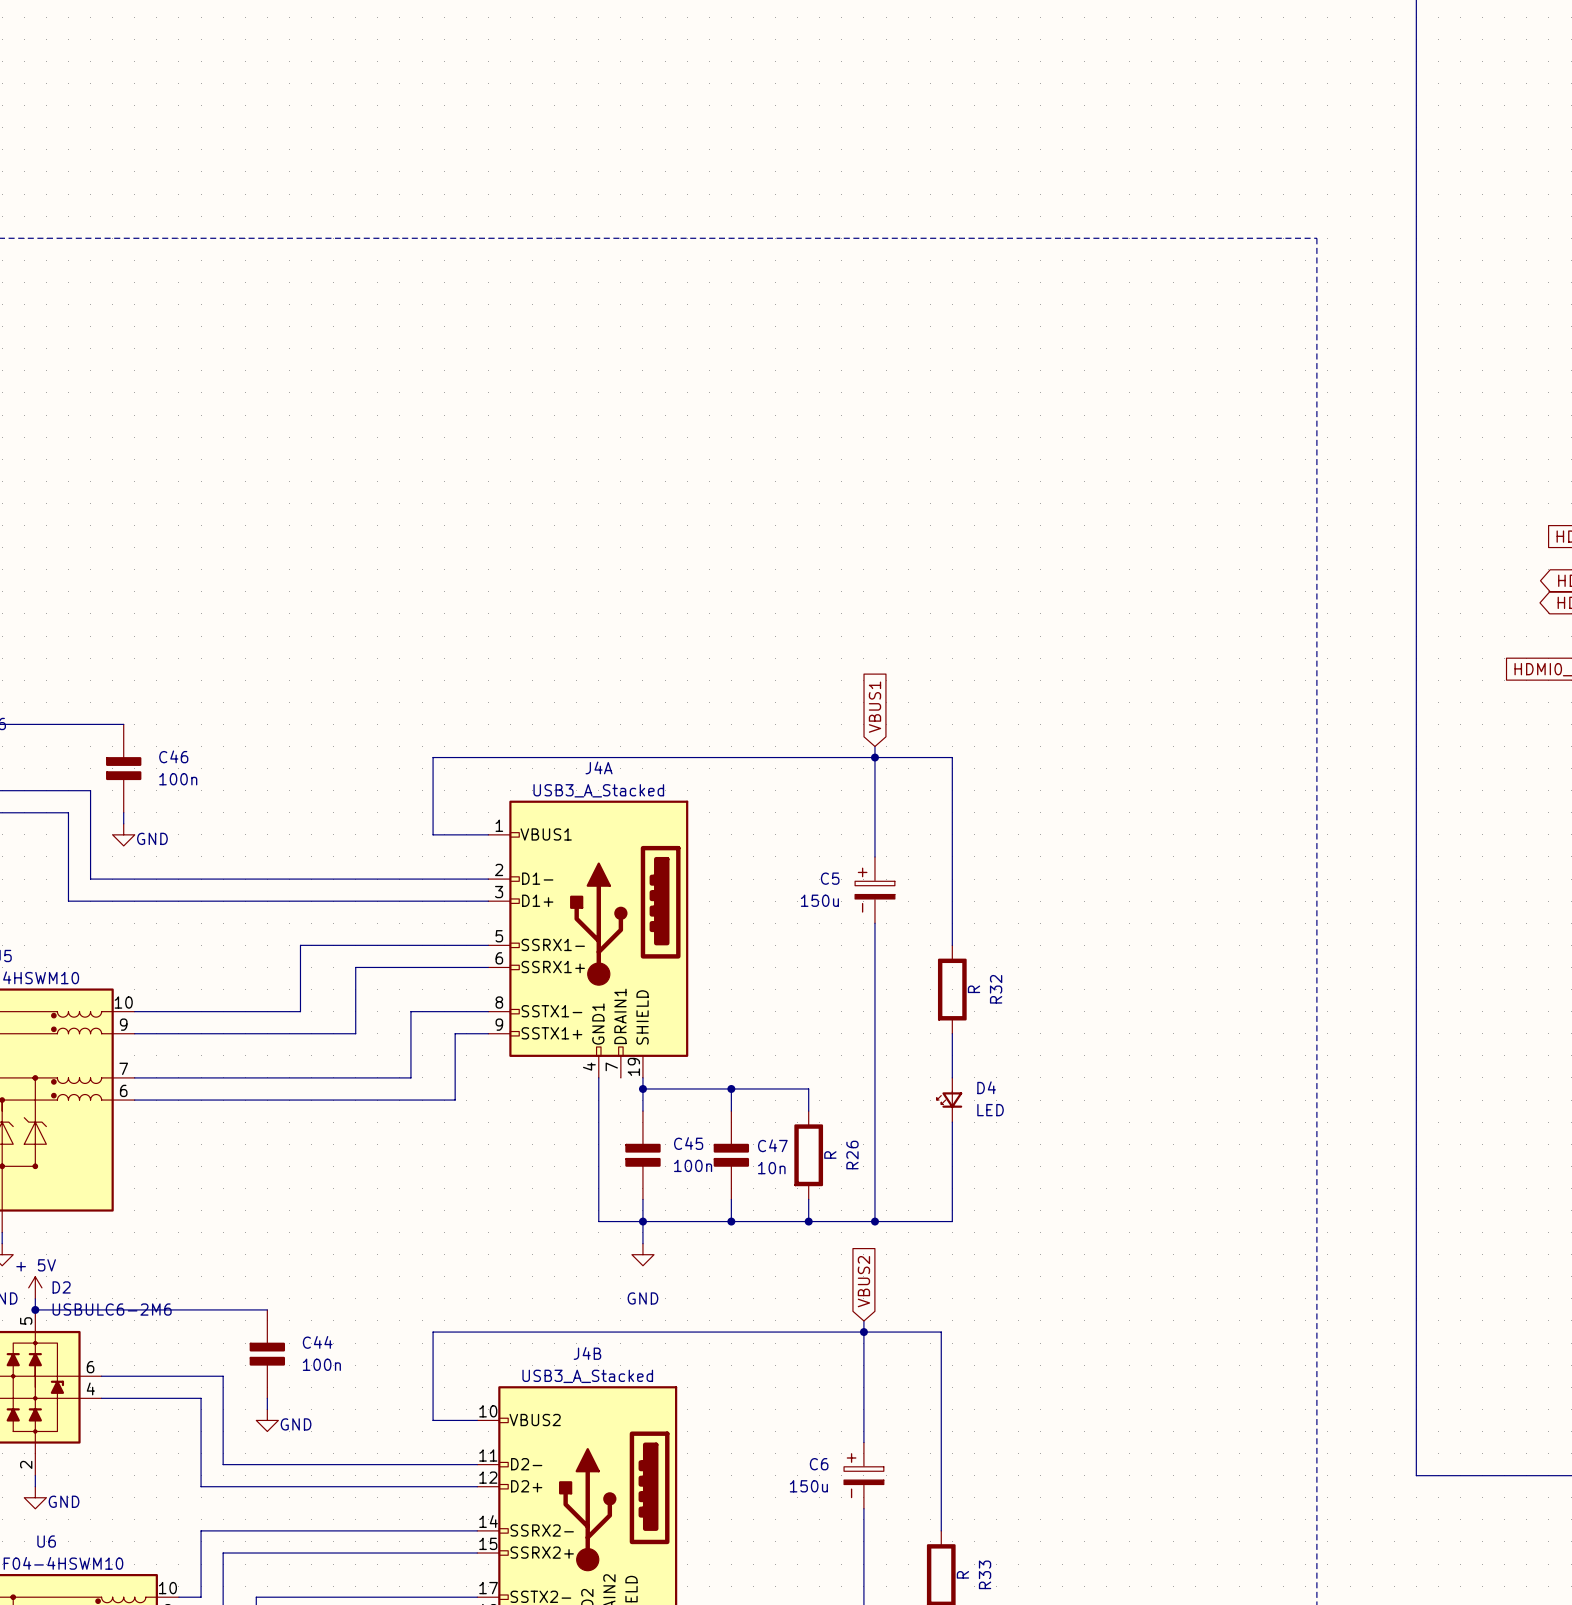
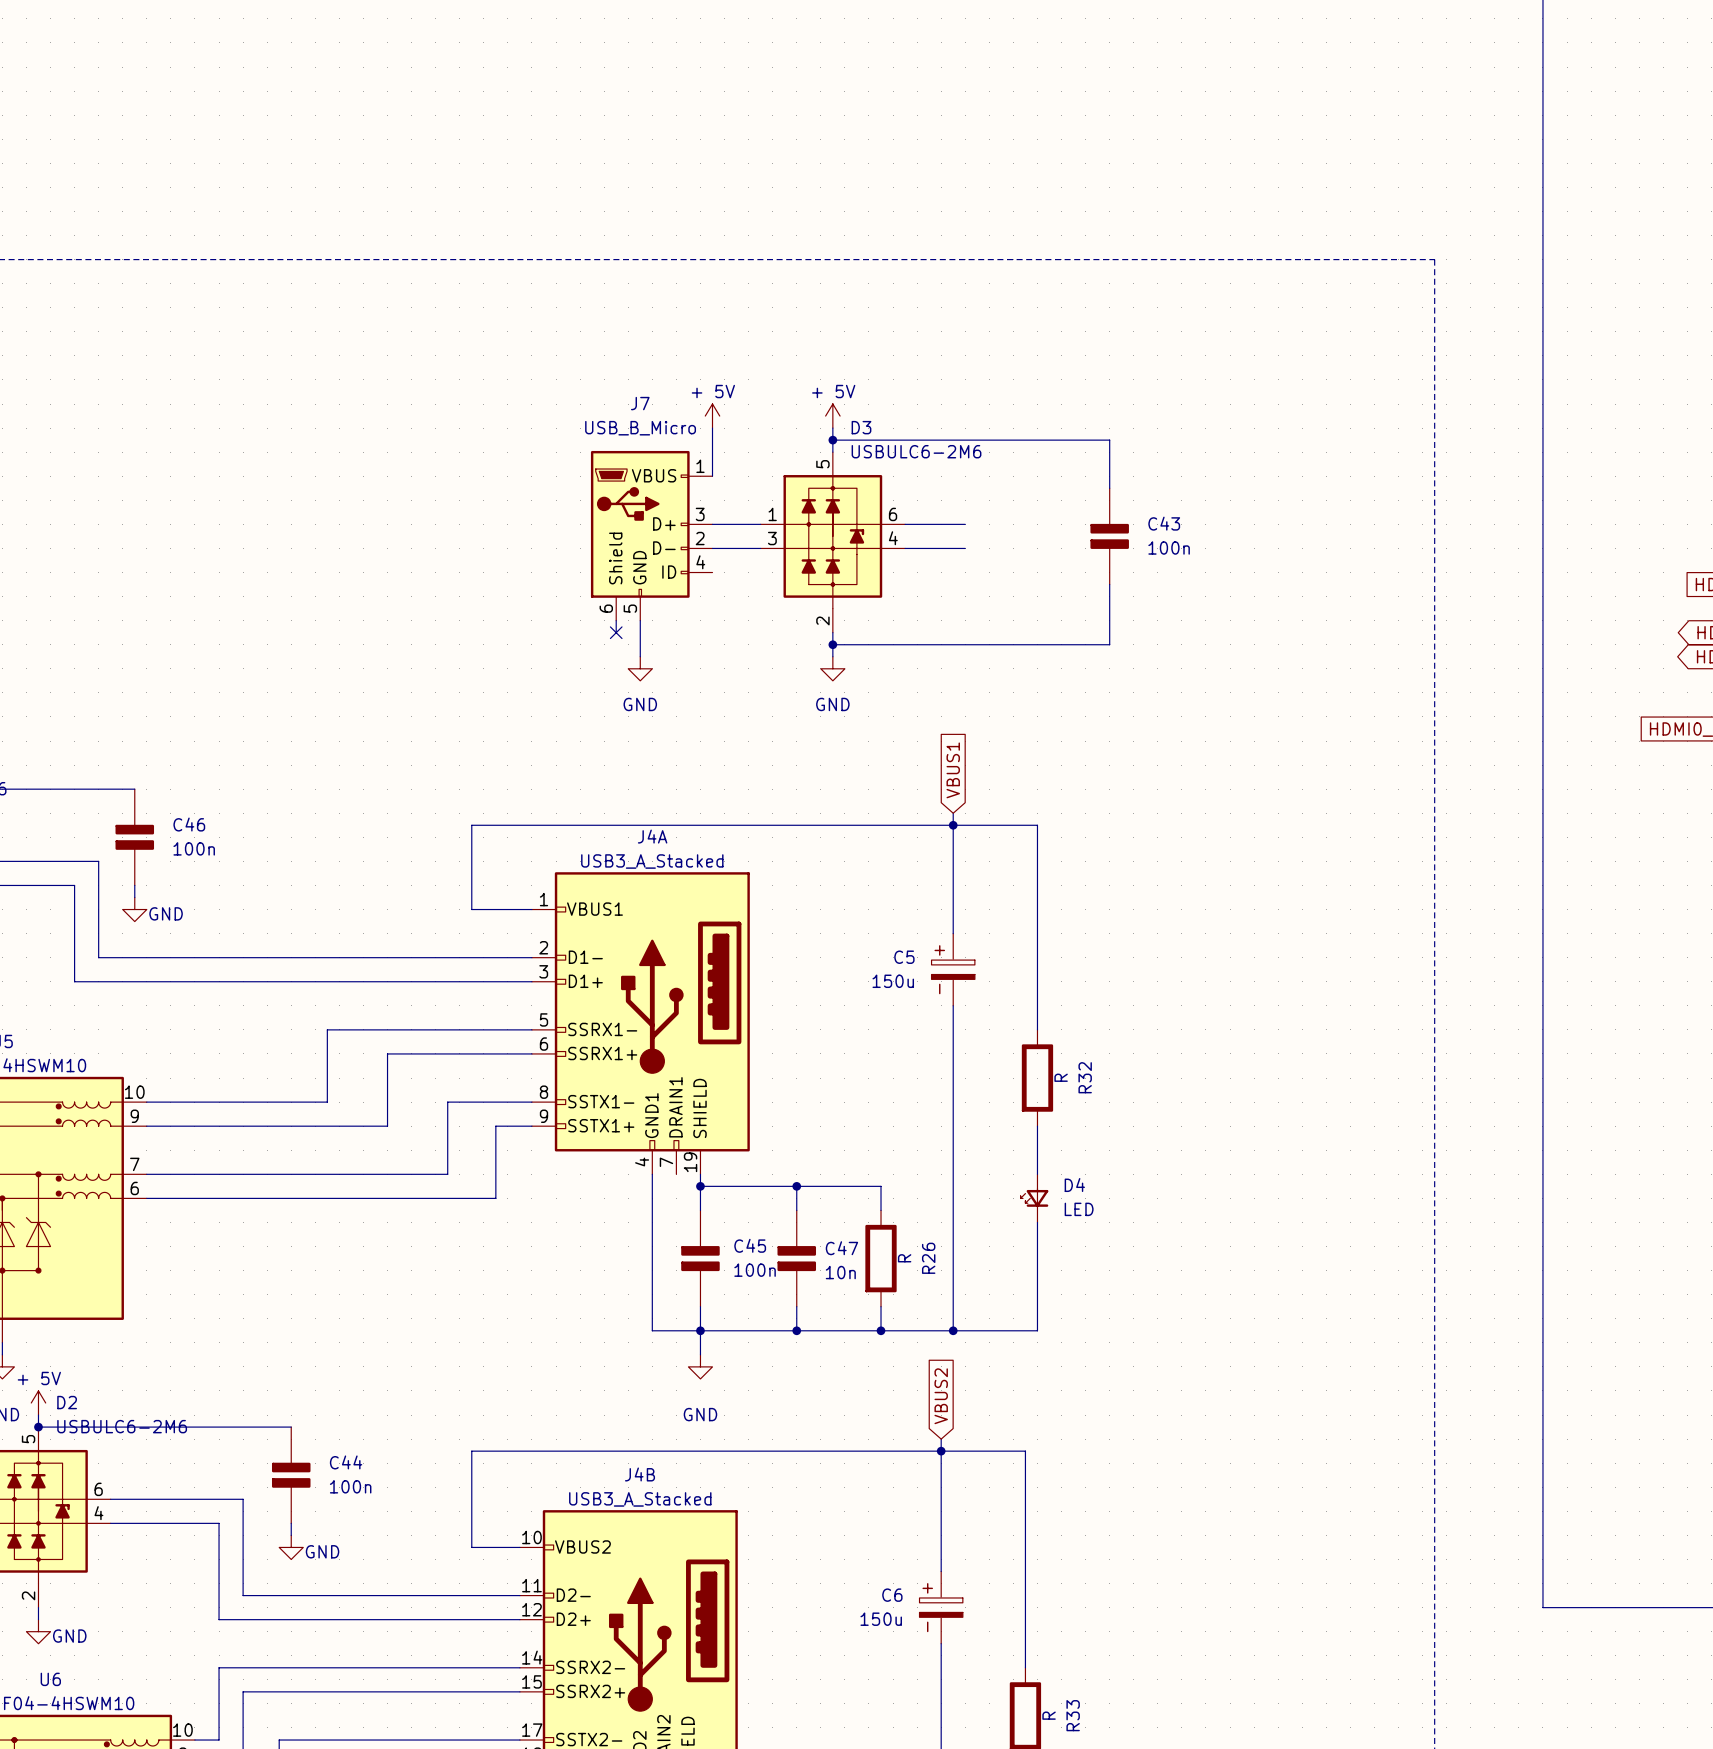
power symbol: none -> + 5V (712, 416)
power symbol: none -> + 5V (832, 416)
wire: none -> (712, 428) (712, 476)
wire: none -> (832, 428) (832, 452)
wire: none -> (832, 440) (1109, 440) (1109, 488)
junction: none -> (832, 440)
wire: none -> (712, 524) (760, 524)
wire: none -> (905, 524) (965, 524)
J7: none -> USB_B_Micro (651, 535)
C43: none -> 100n (1109, 536)
D3: none -> USBULC6-2M6 (832, 542)
wire: none -> (712, 548) (760, 548)
wire: none -> (905, 548) (965, 548)
wire: none -> (1109, 584) (1109, 644) (832, 644)
wire: none -> (616, 620) (616, 632)
wire: none -> (640, 620) (640, 656)
no-connect mark: none -> (616, 632)
wire: none -> (832, 632) (832, 656)
junction: none -> (832, 644)
power symbol: none -> GND (640, 668)
power symbol: none -> GND (832, 668)

